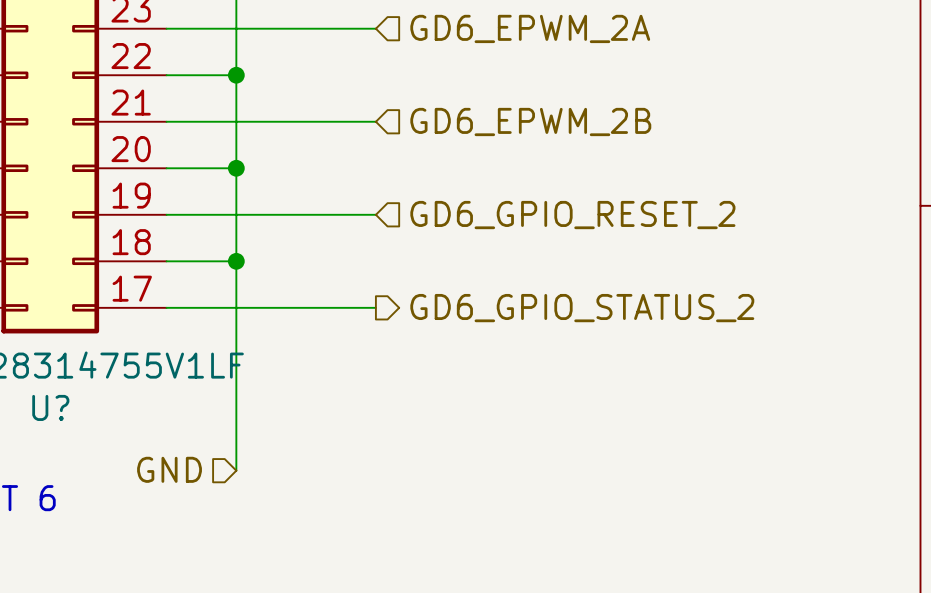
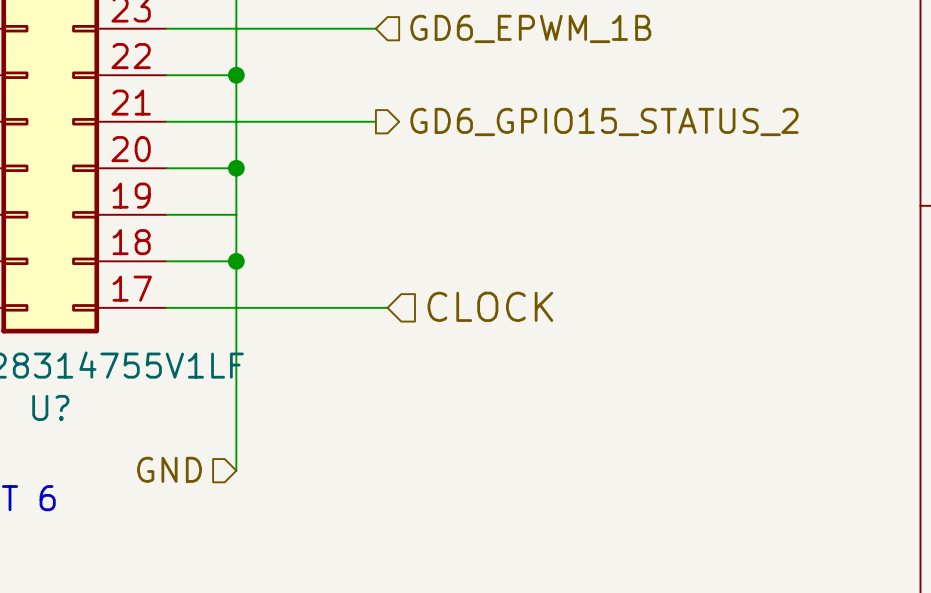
hierarchical label: GD6_EPWM_2A (530, 28) -> GD6_EPWM_1B (530, 28)
hierarchical label shape: input (530, 122) -> output (604, 122)
hierarchical label: GD6_EPWM_2B (530, 122) -> GD6_GPIO15_STATUS_2 (604, 122)
wire: (236, 214) (375, 214) -> none
hierarchical label: GD6_GPIO_RESET_2 (572, 215) -> none
wire: none -> (375, 307) (387, 307)
hierarchical label shape: output (582, 308) -> input (490, 306)
hierarchical label: GD6_GPIO_STATUS_2 (582, 308) -> CLOCK (490, 306)

